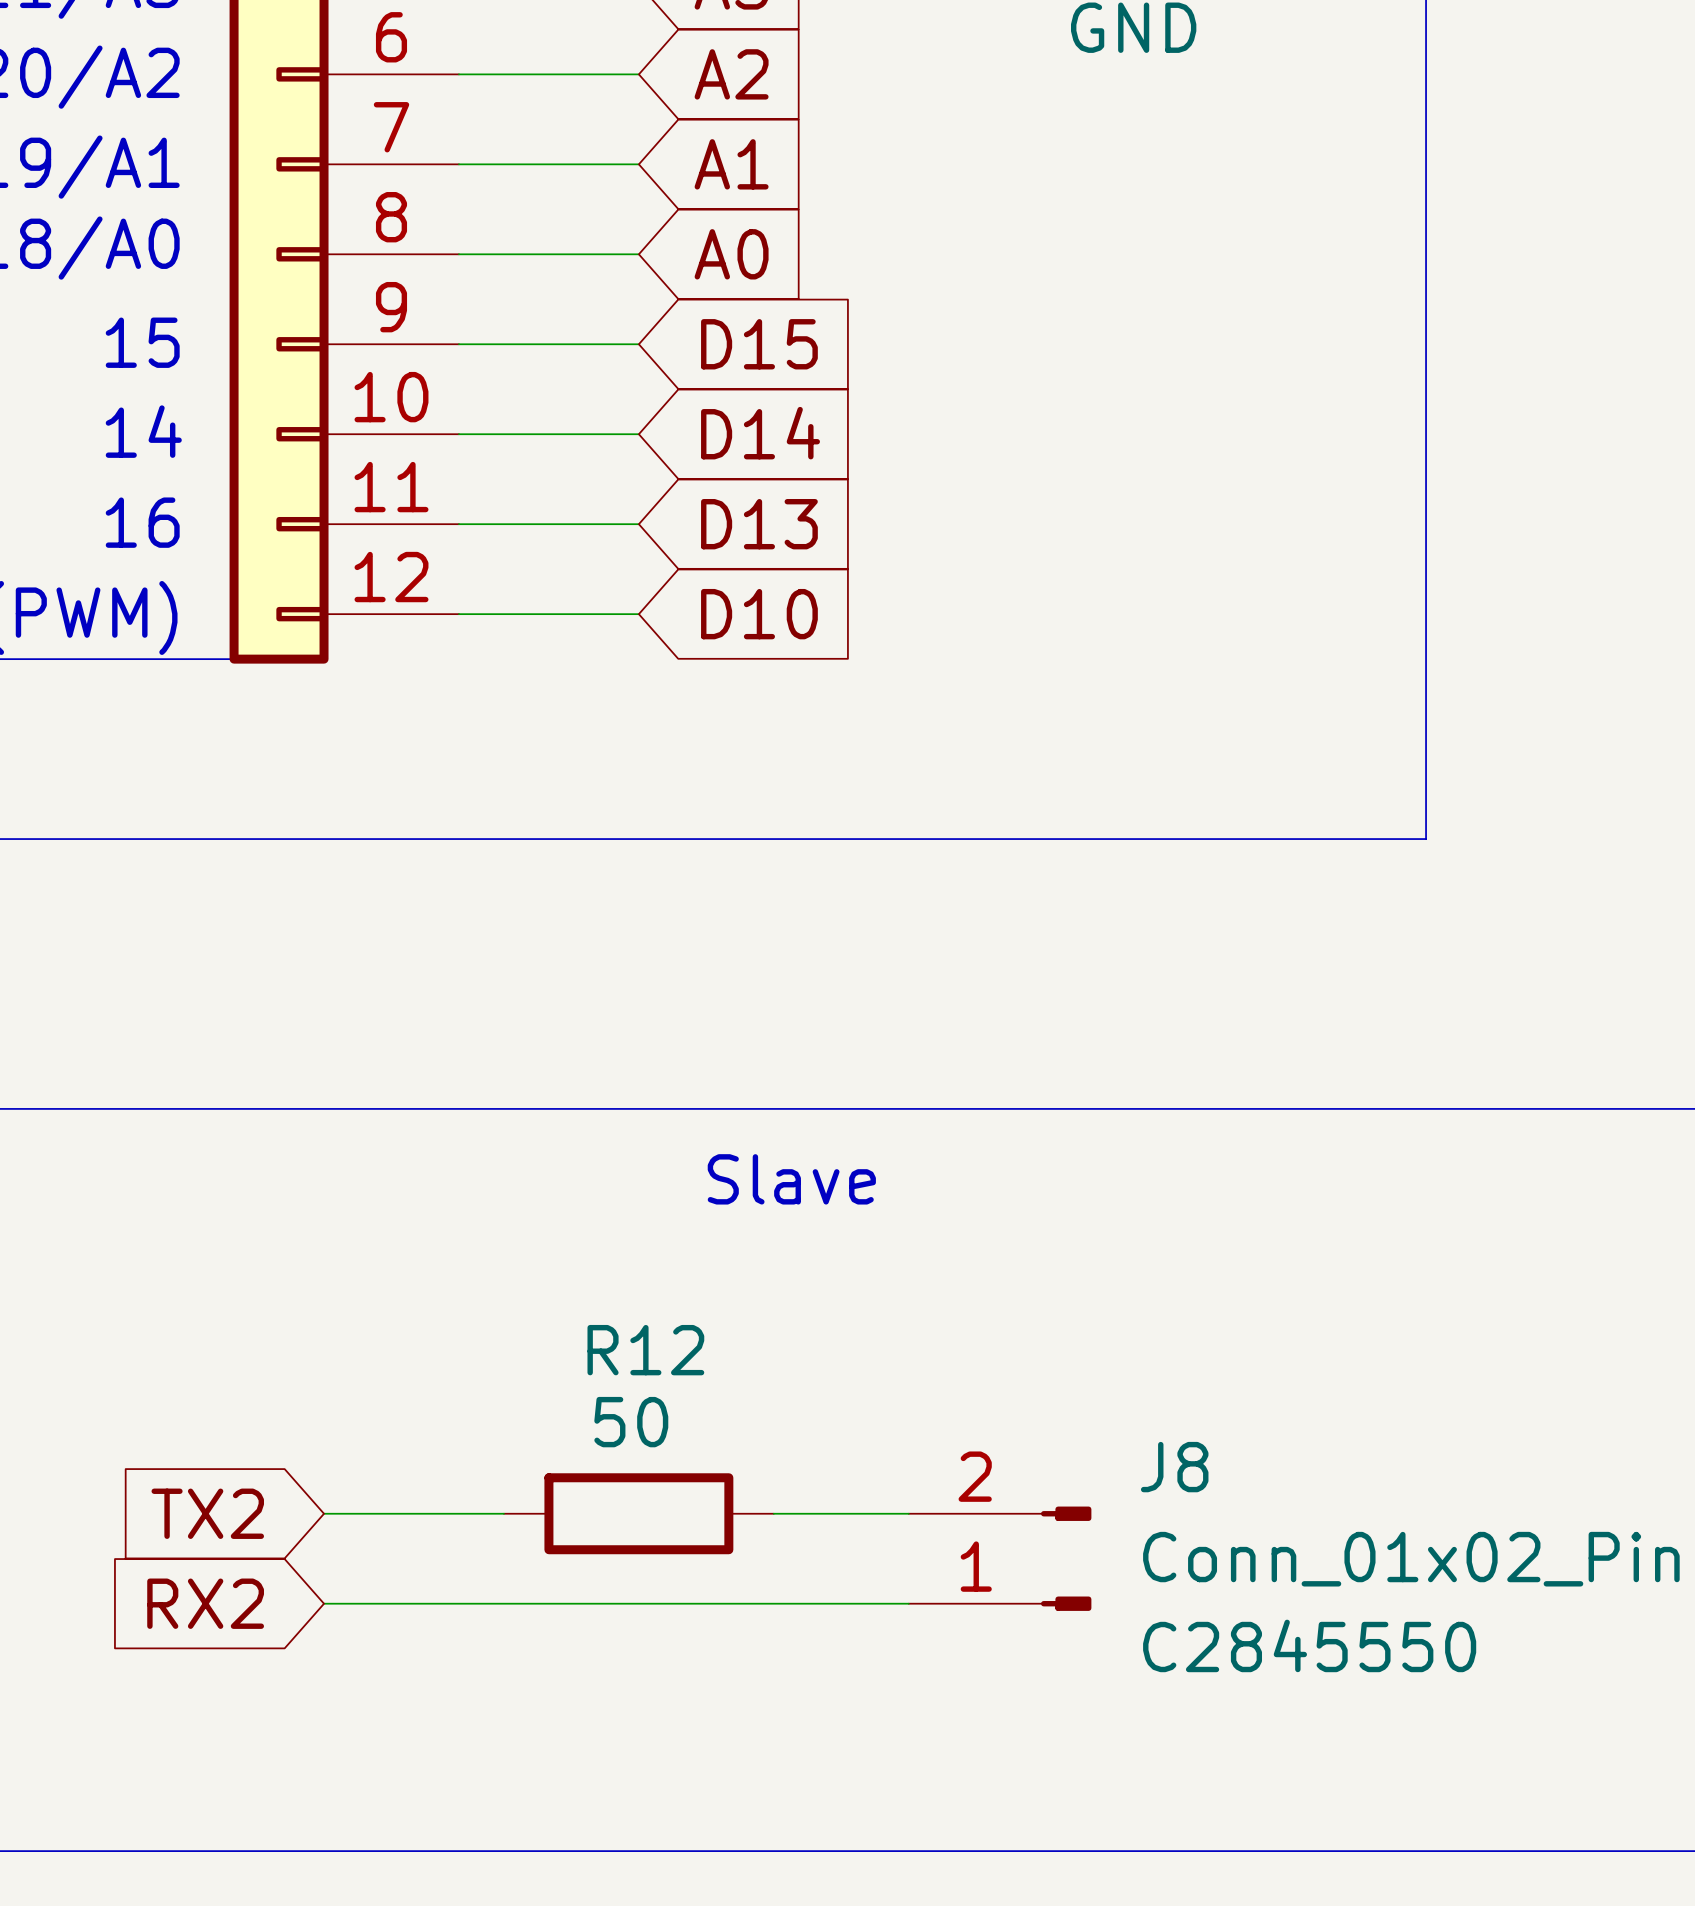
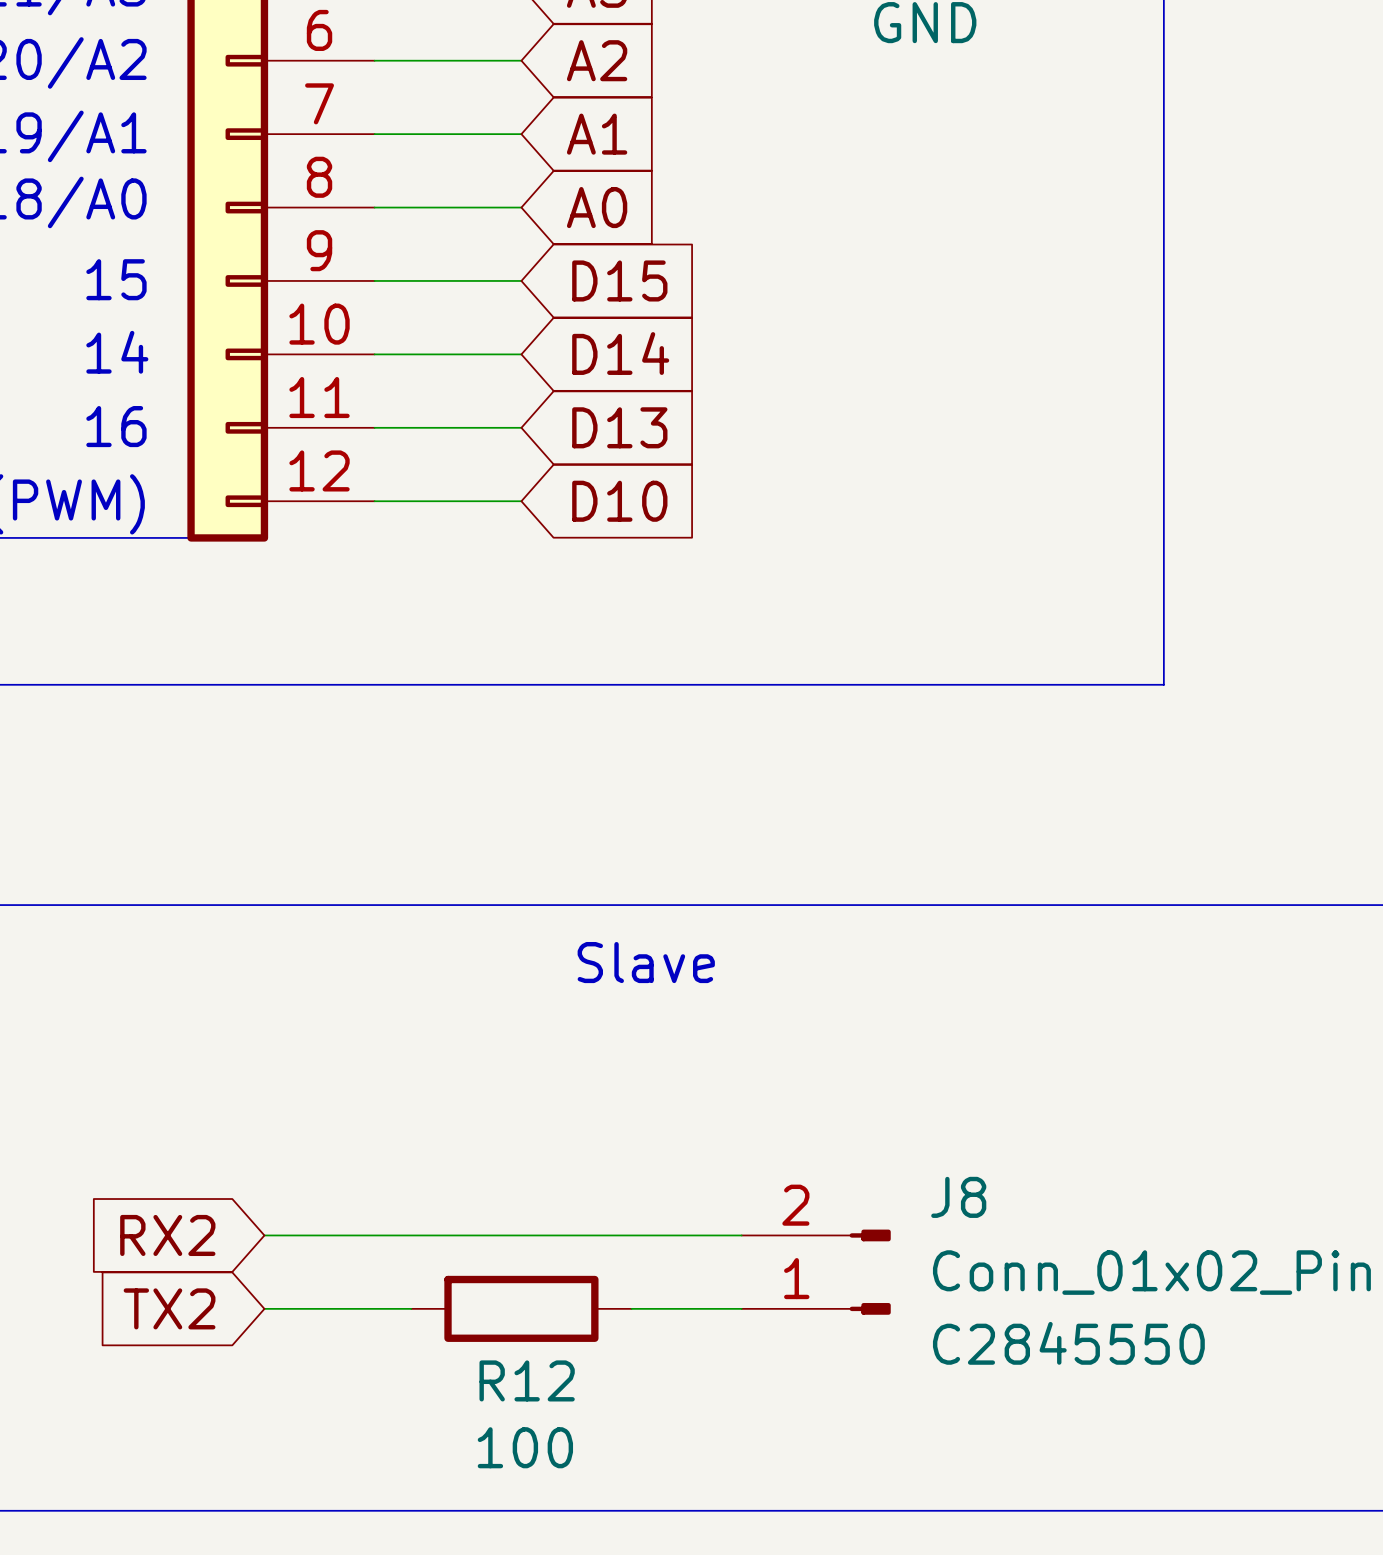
R12 name position: R12 (645, 1350) -> R12 (527, 1380)
R12 value: 50 (631, 1422) -> 100 (525, 1447)
global label: TX2 (207, 1513) -> RX2 (167, 1235)
R12 position: (638, 1513) -> (521, 1308)
global label: RX2 (205, 1603) -> TX2 (169, 1308)
wire: (503, 1603) (773, 1603) -> (411, 1235) (631, 1235)

